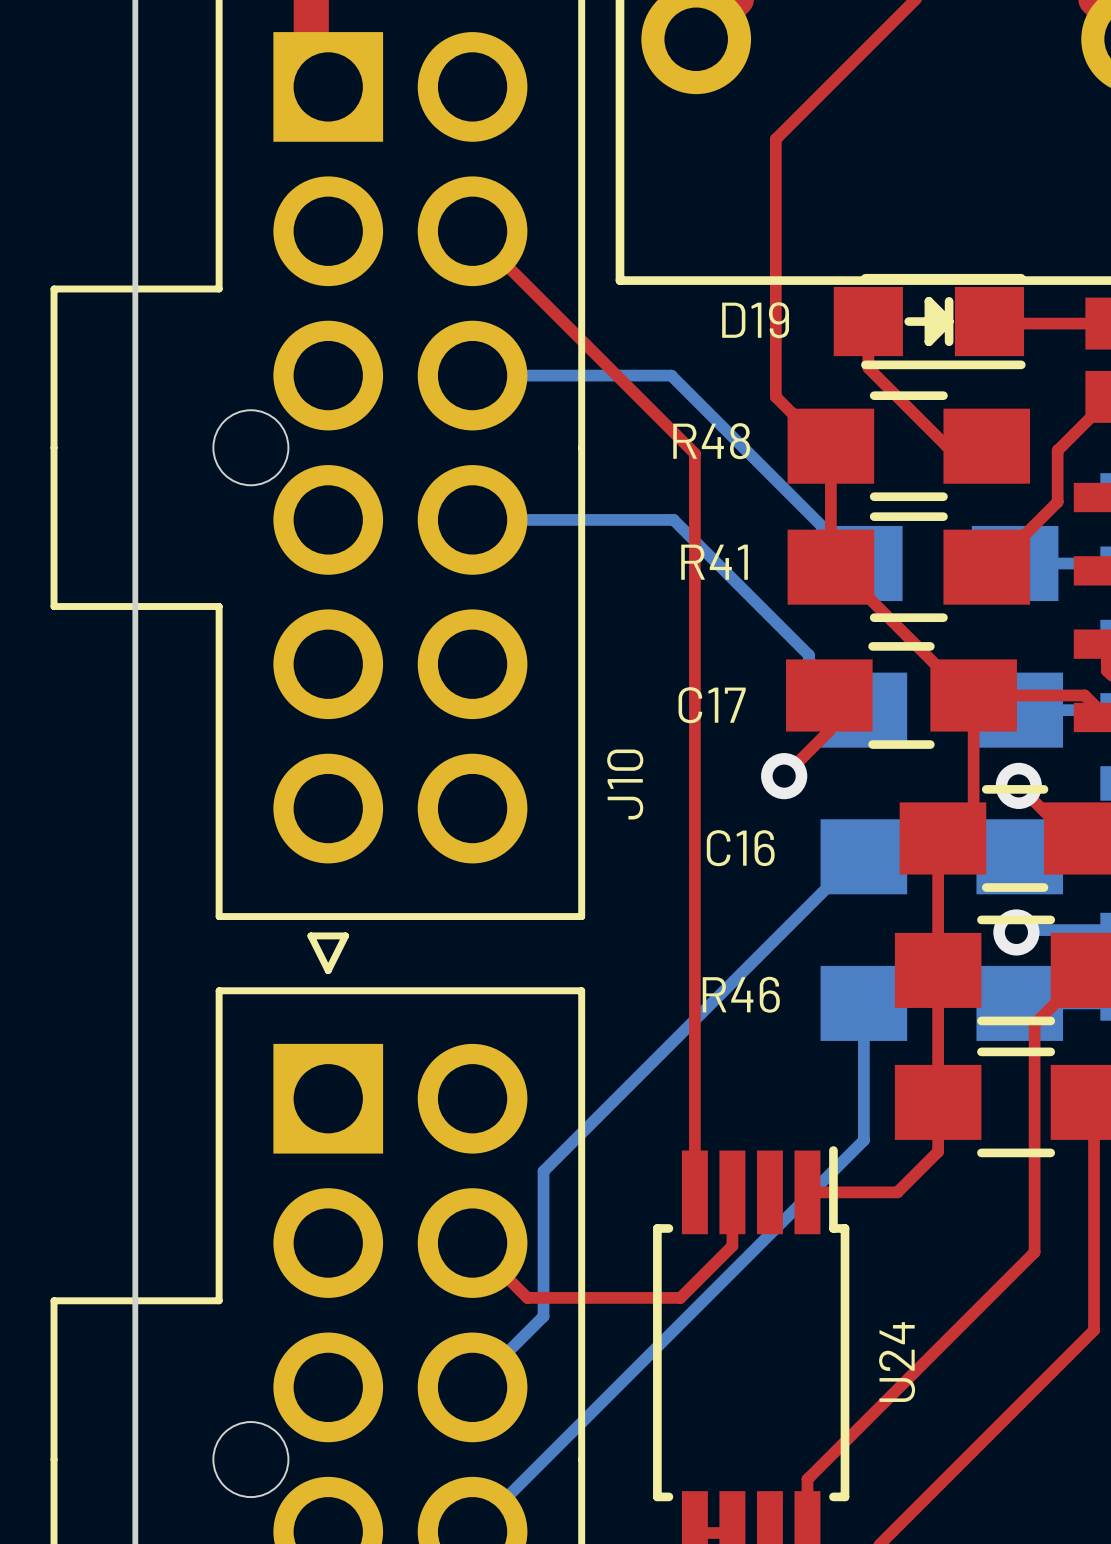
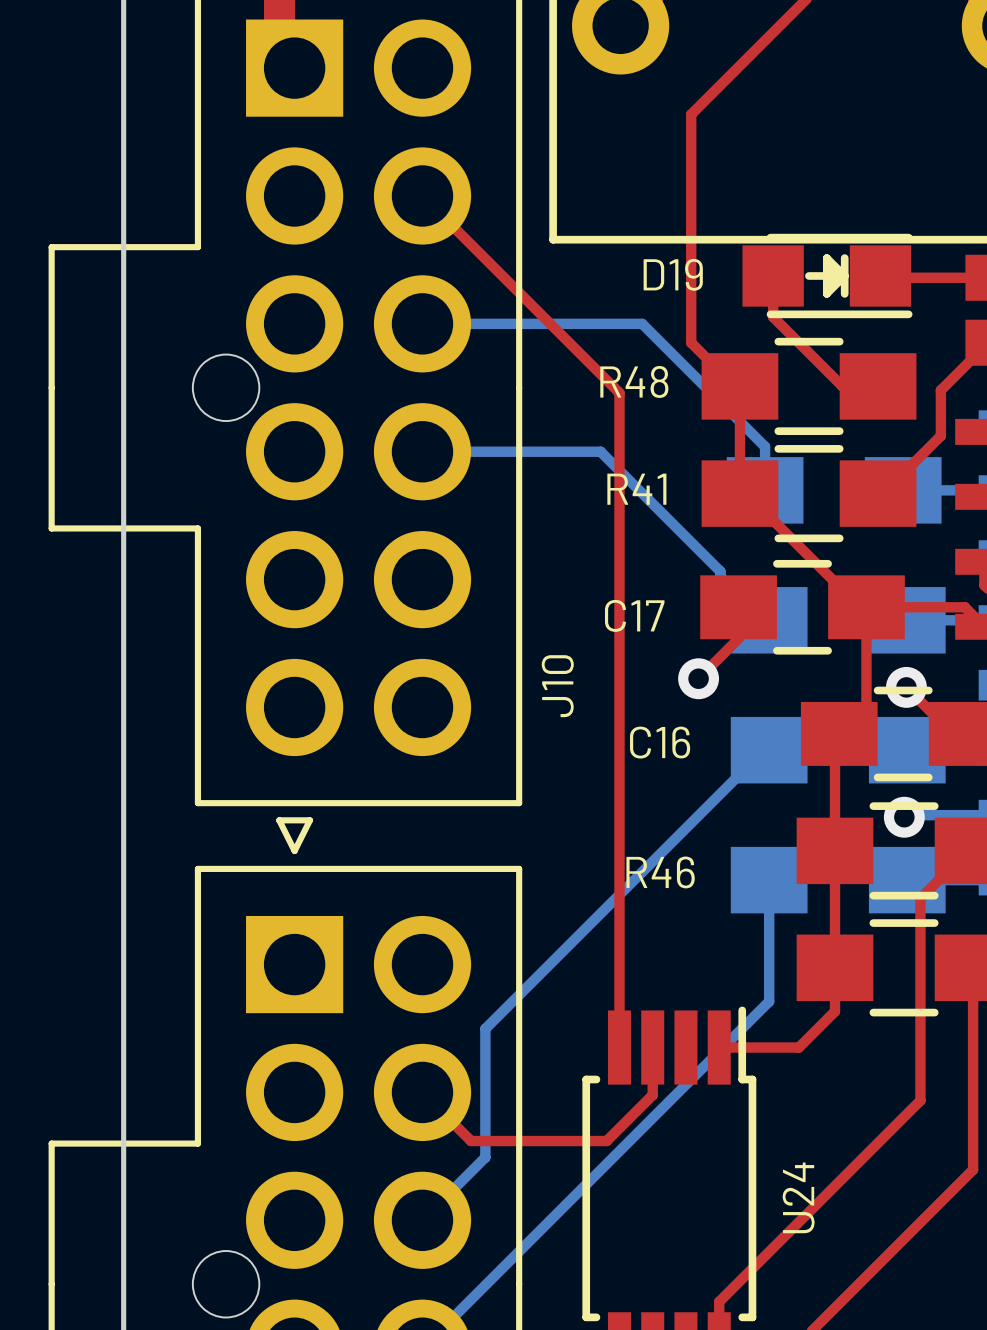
bottom track: (671, 375) (859, 563) -> (598, 323) (642, 323) (765, 446) (765, 490) (759, 490)

